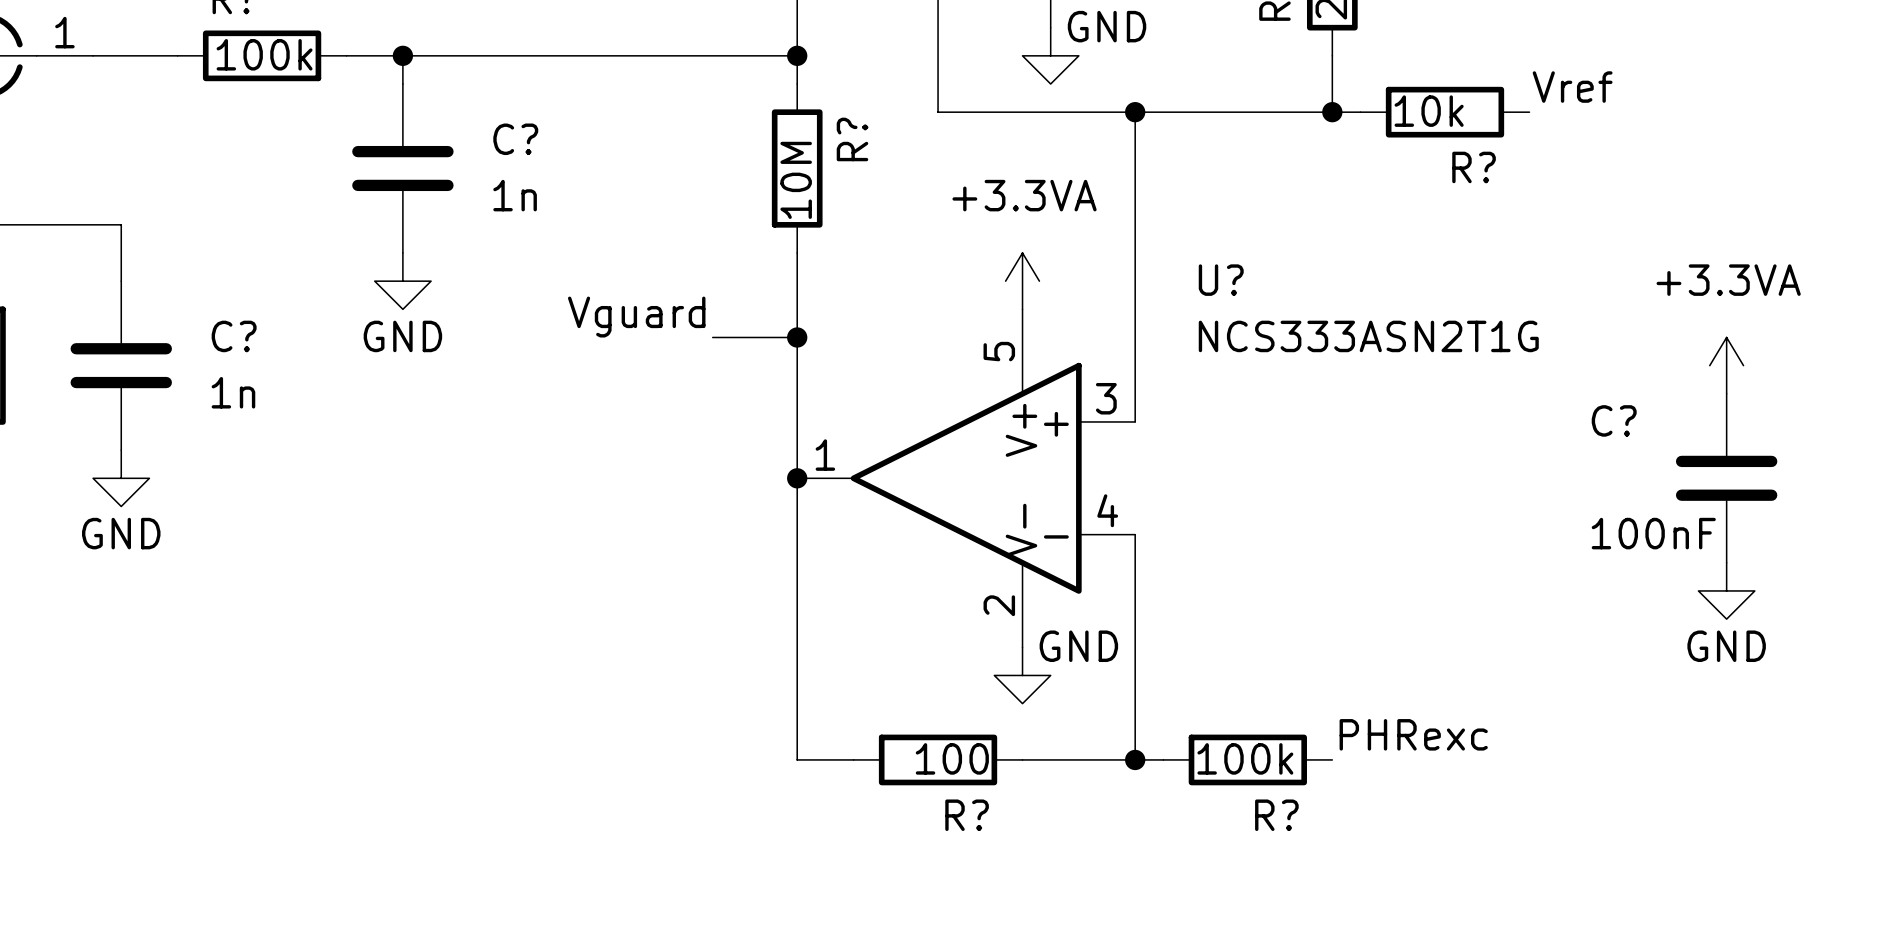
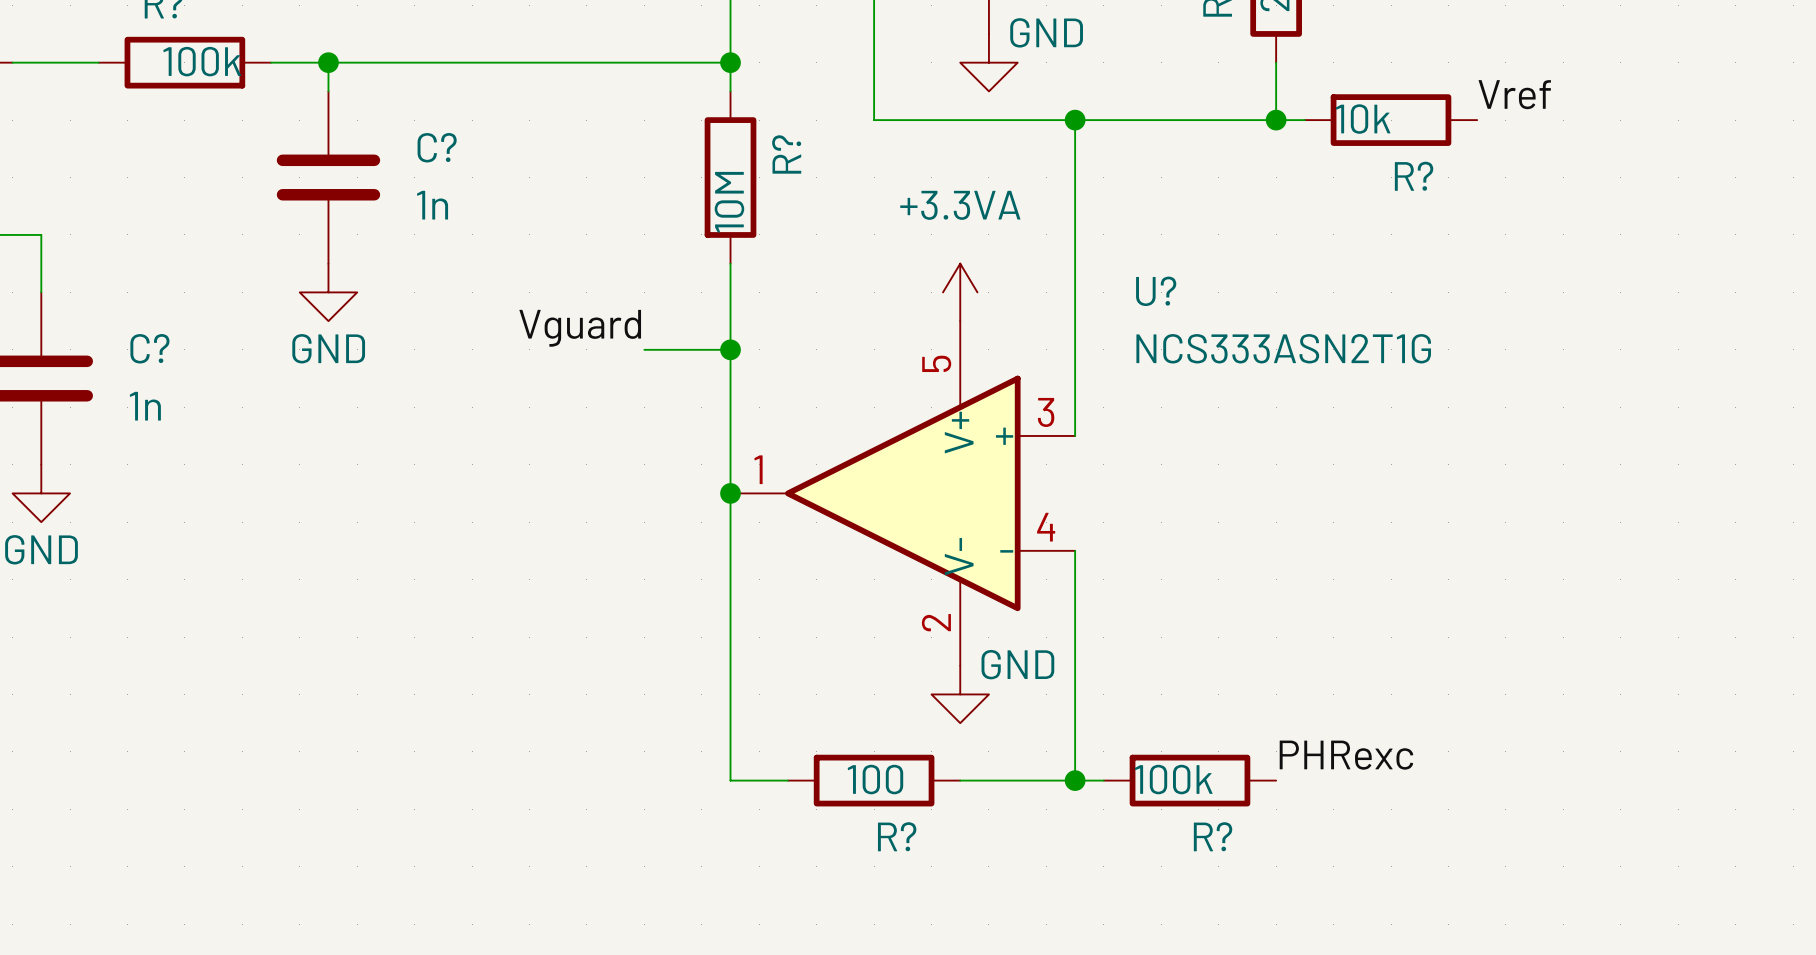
power symbol: +3.3VA (1726, 365) -> none
C?: 100nF (1726, 478) -> none
power symbol: GND (1726, 590) -> none

